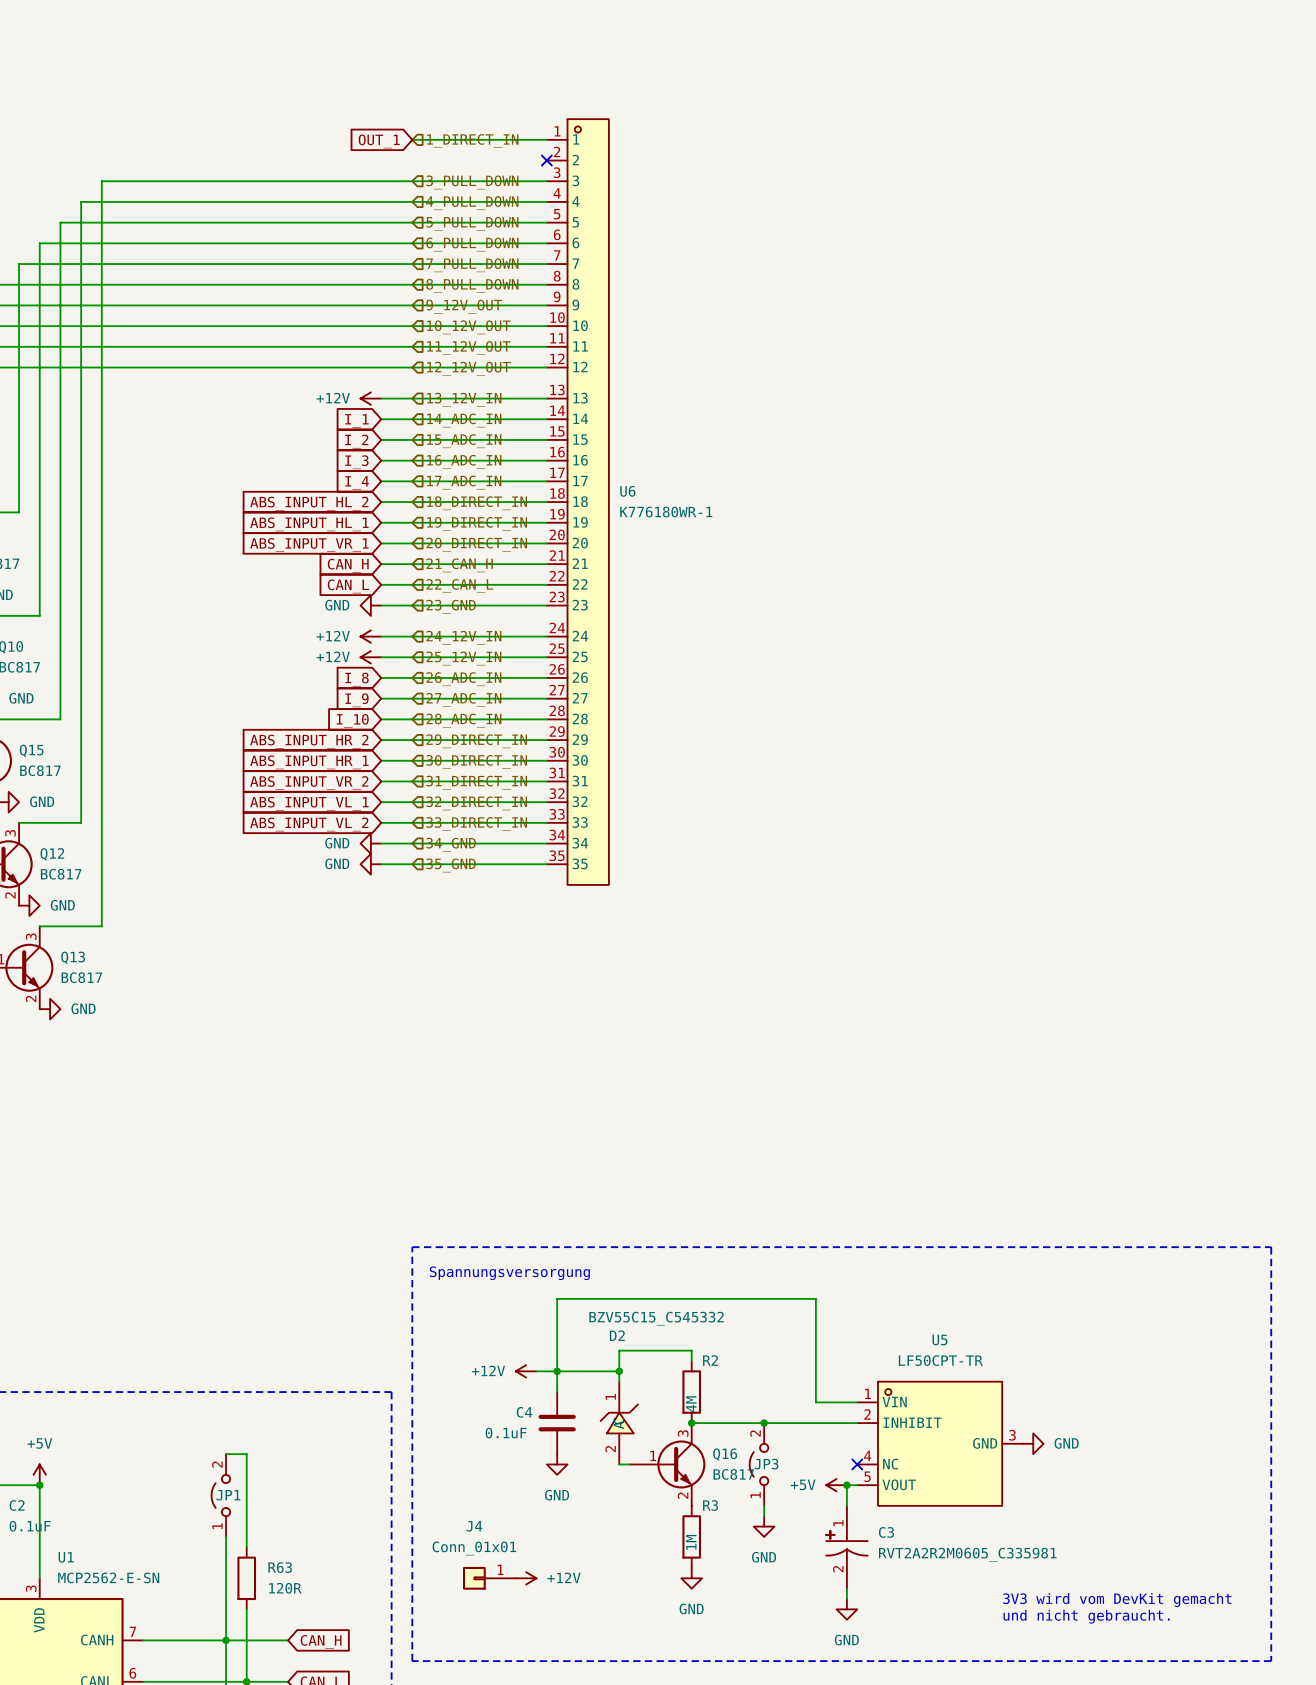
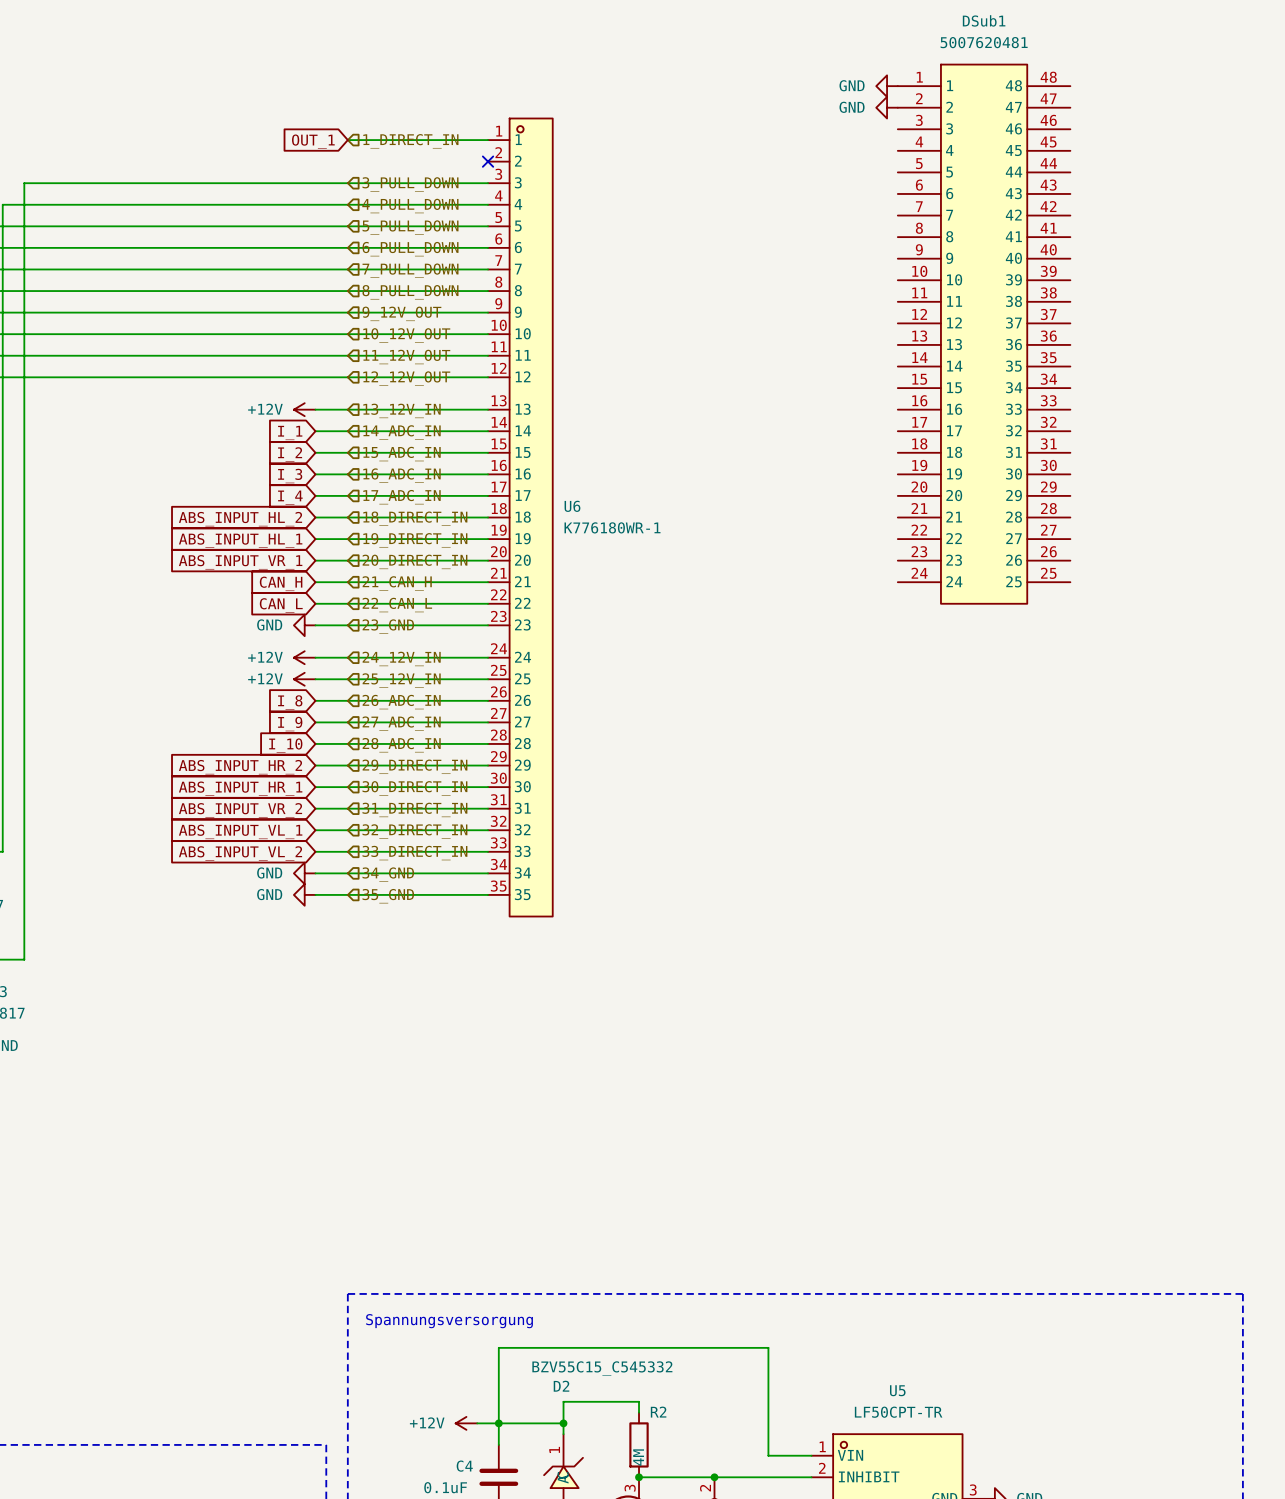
power symbol: none -> GND (887, 86)
power symbol: none -> GND (887, 107)
DSub1: none -> 5007620481 (984, 334)

